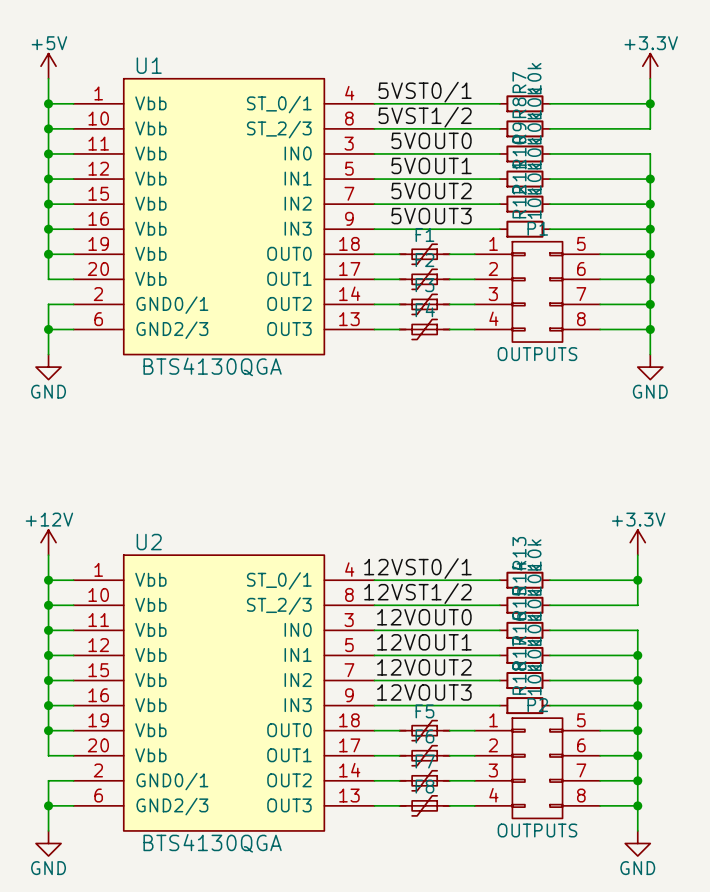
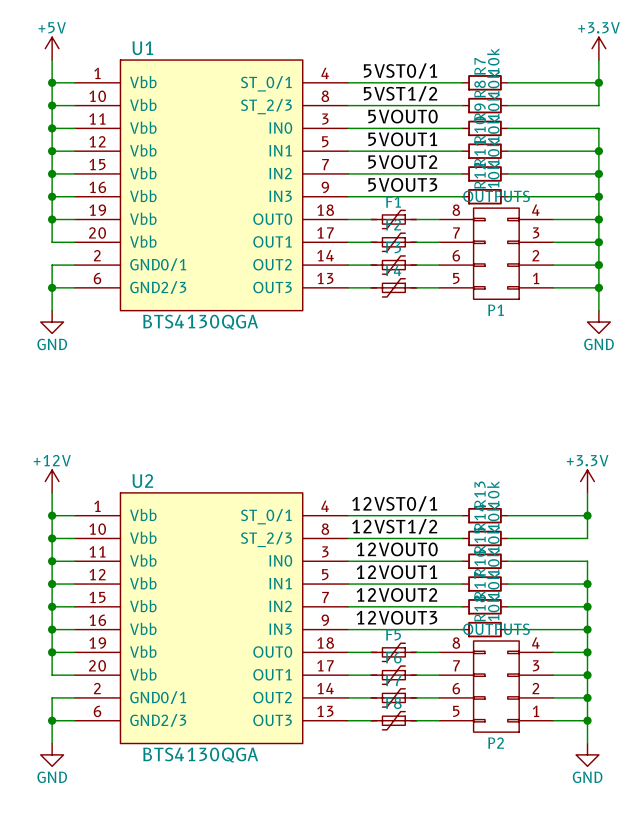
P1 rotation: 0° (537, 291) -> 180° (496, 253)
P2 rotation: 0° (537, 768) -> 180° (496, 686)

